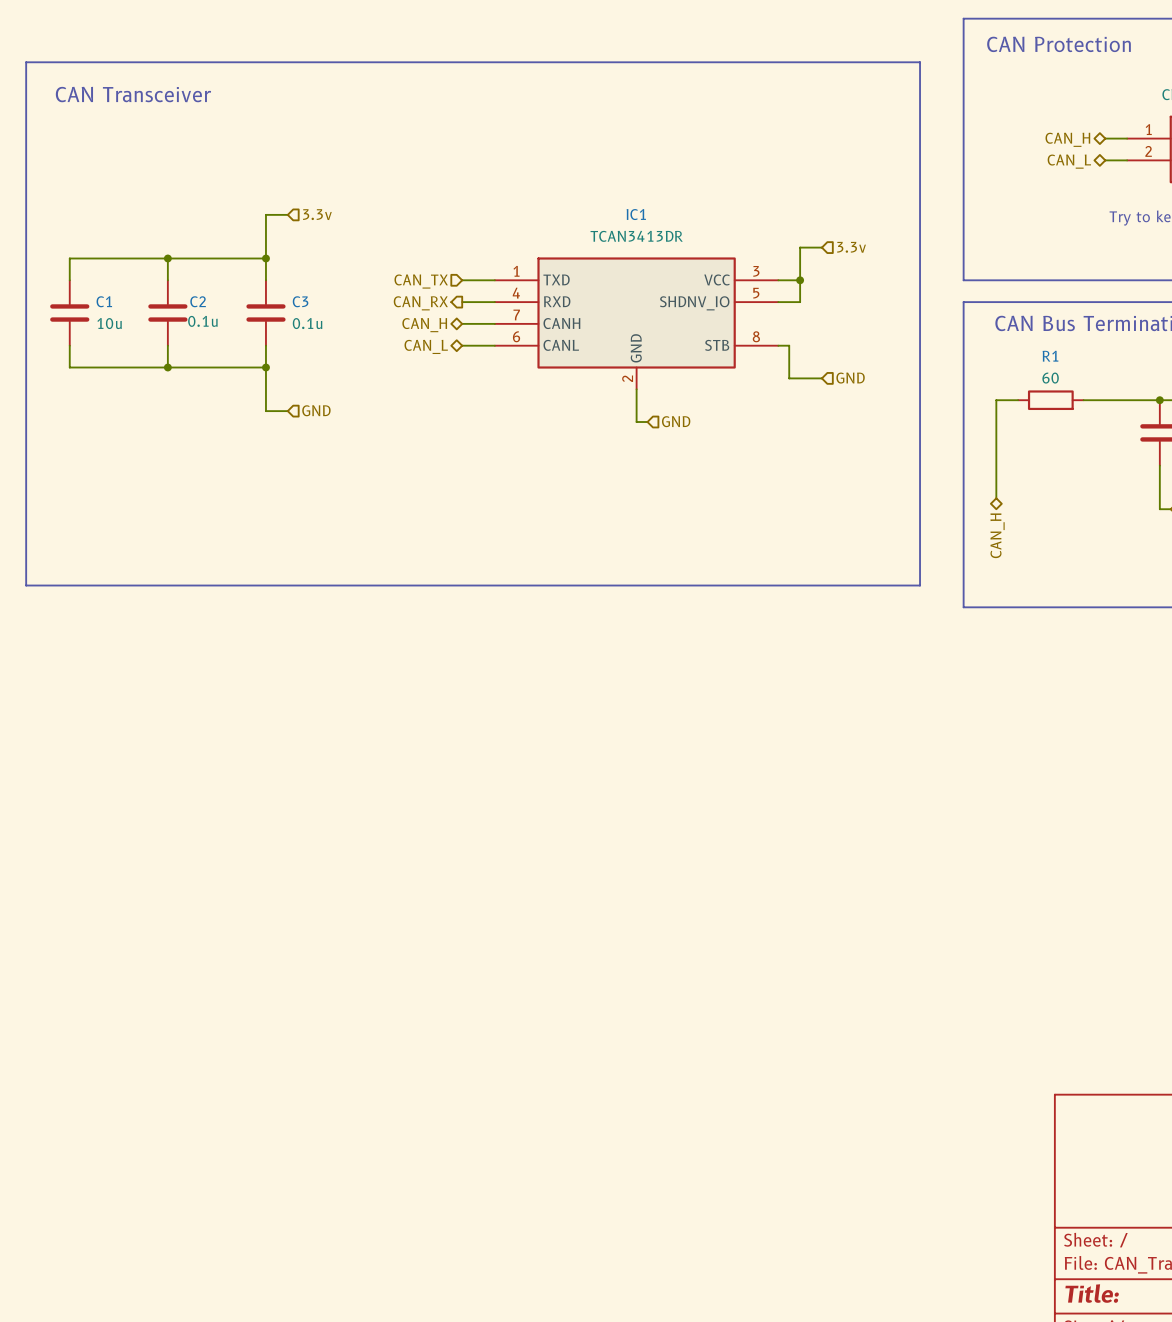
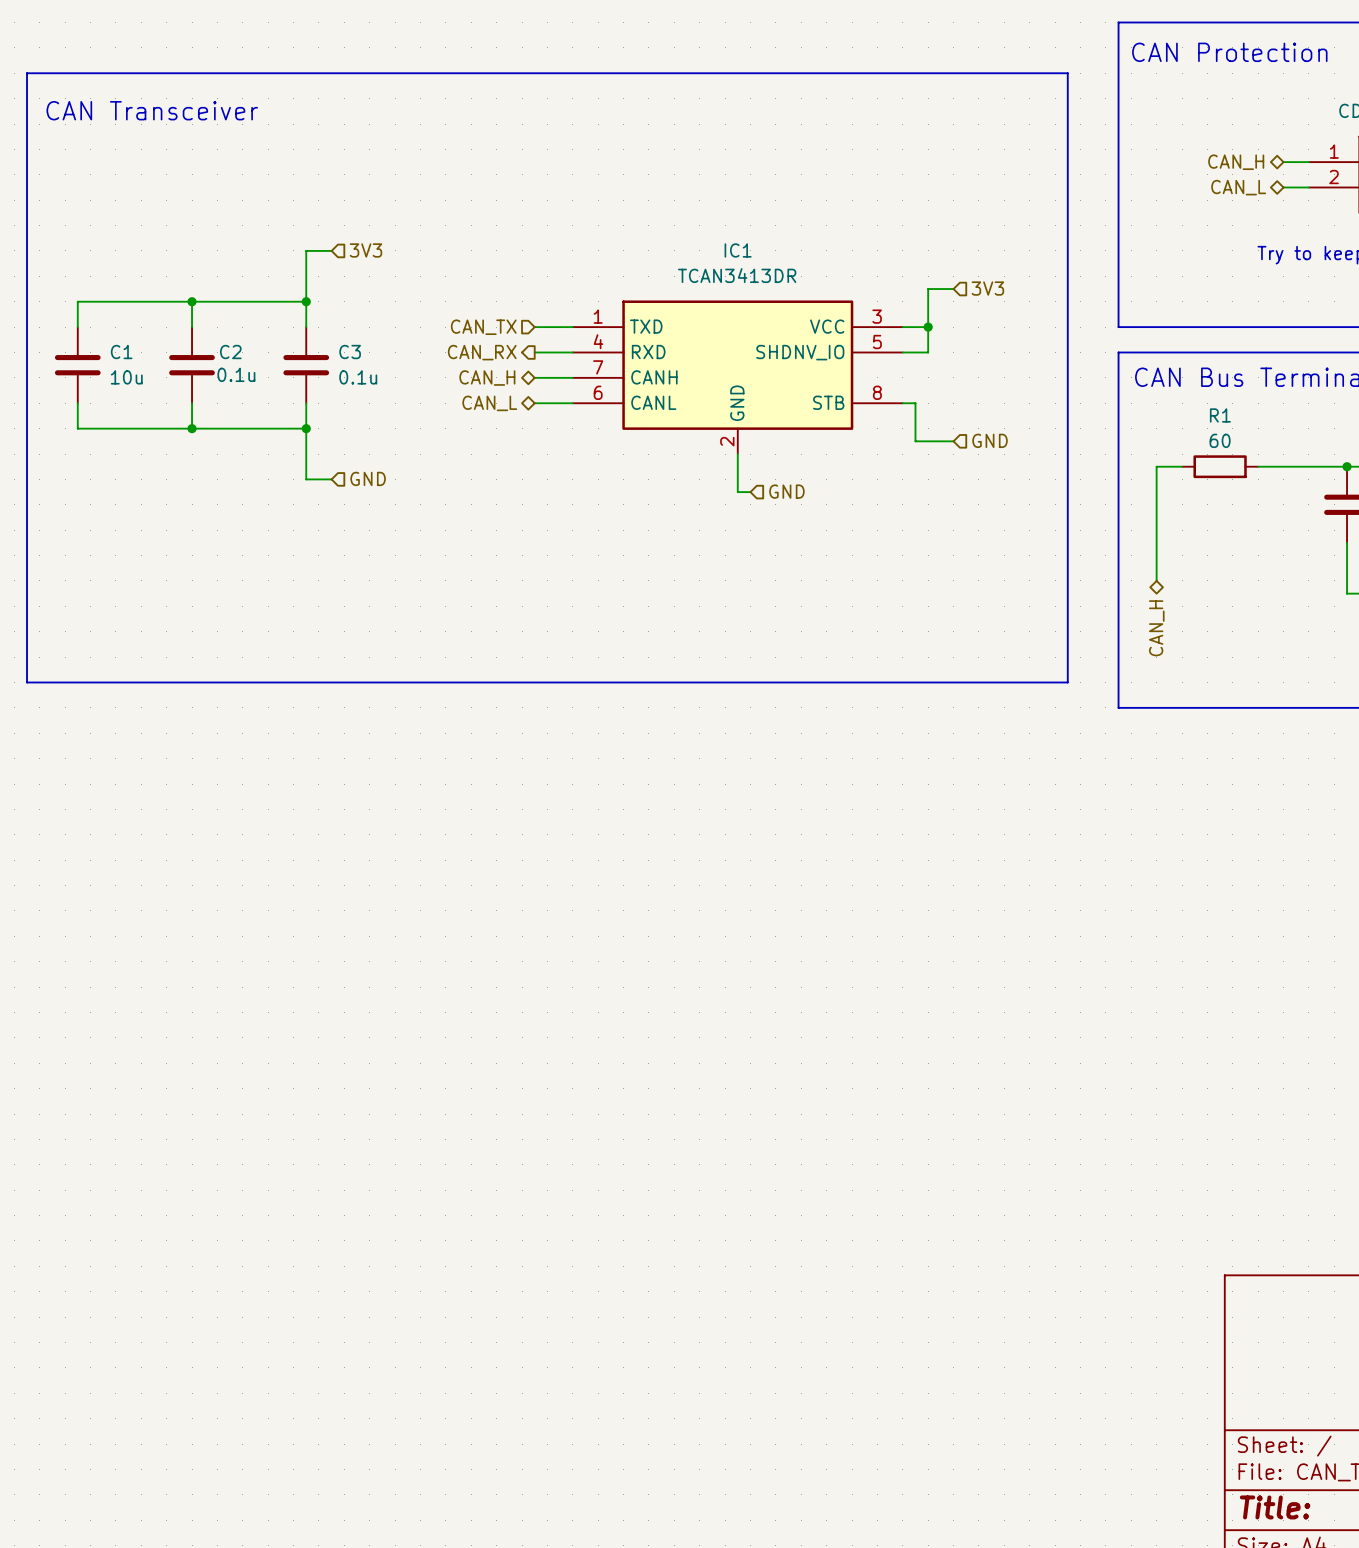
hierarchical label: 3.3v (317, 214) -> 3V3 (365, 250)
hierarchical label: 3.3v (851, 247) -> 3V3 (987, 288)

